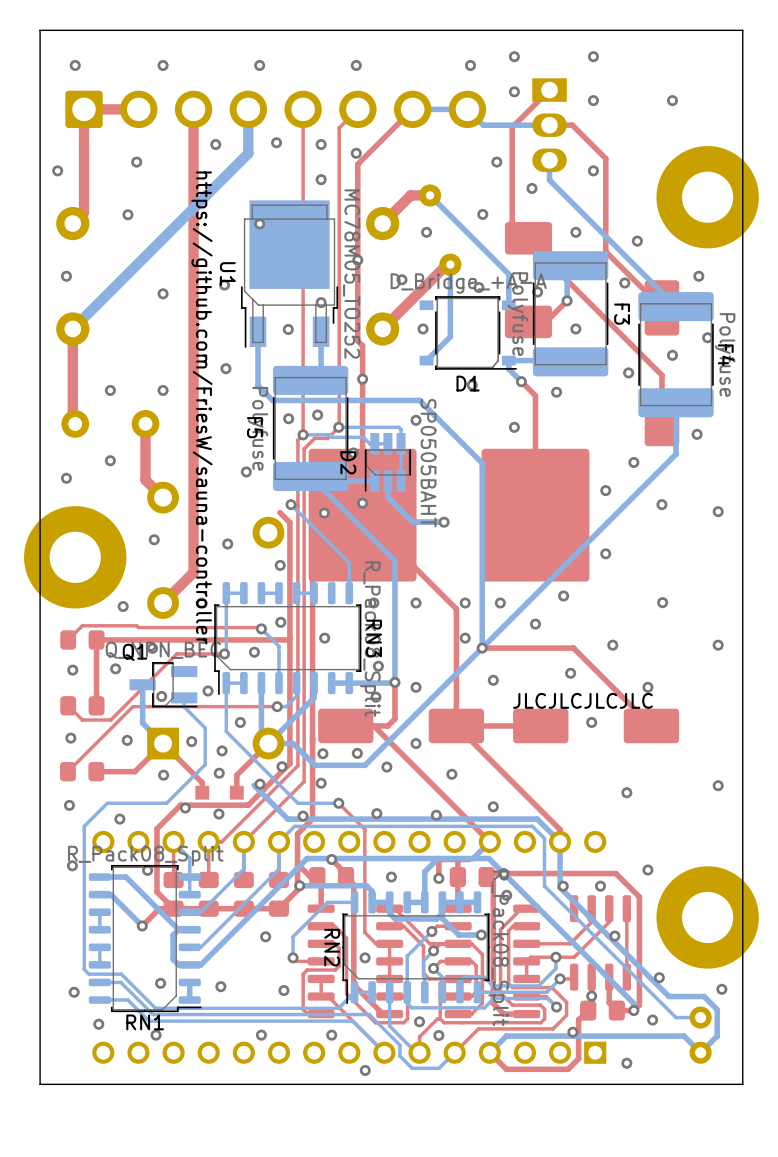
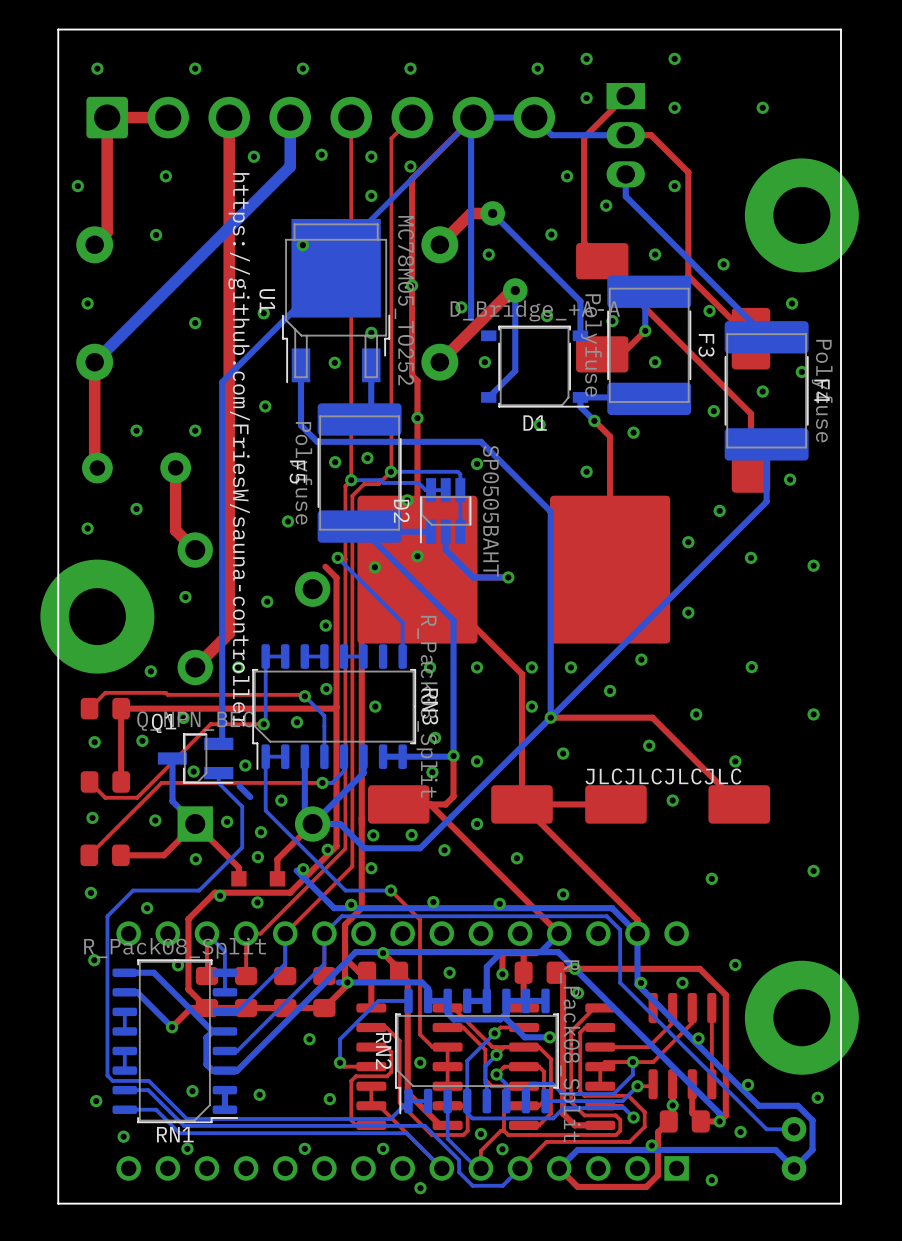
bottom track: none -> (336, 254) (473, 117) (471, 119) (471, 318)
bottom track: none -> (336, 268) (222, 382) (222, 740) (218, 743)
bottom track: none -> (239, 786) (250, 797)
bottom track: none -> (347, 982) (338, 982)

